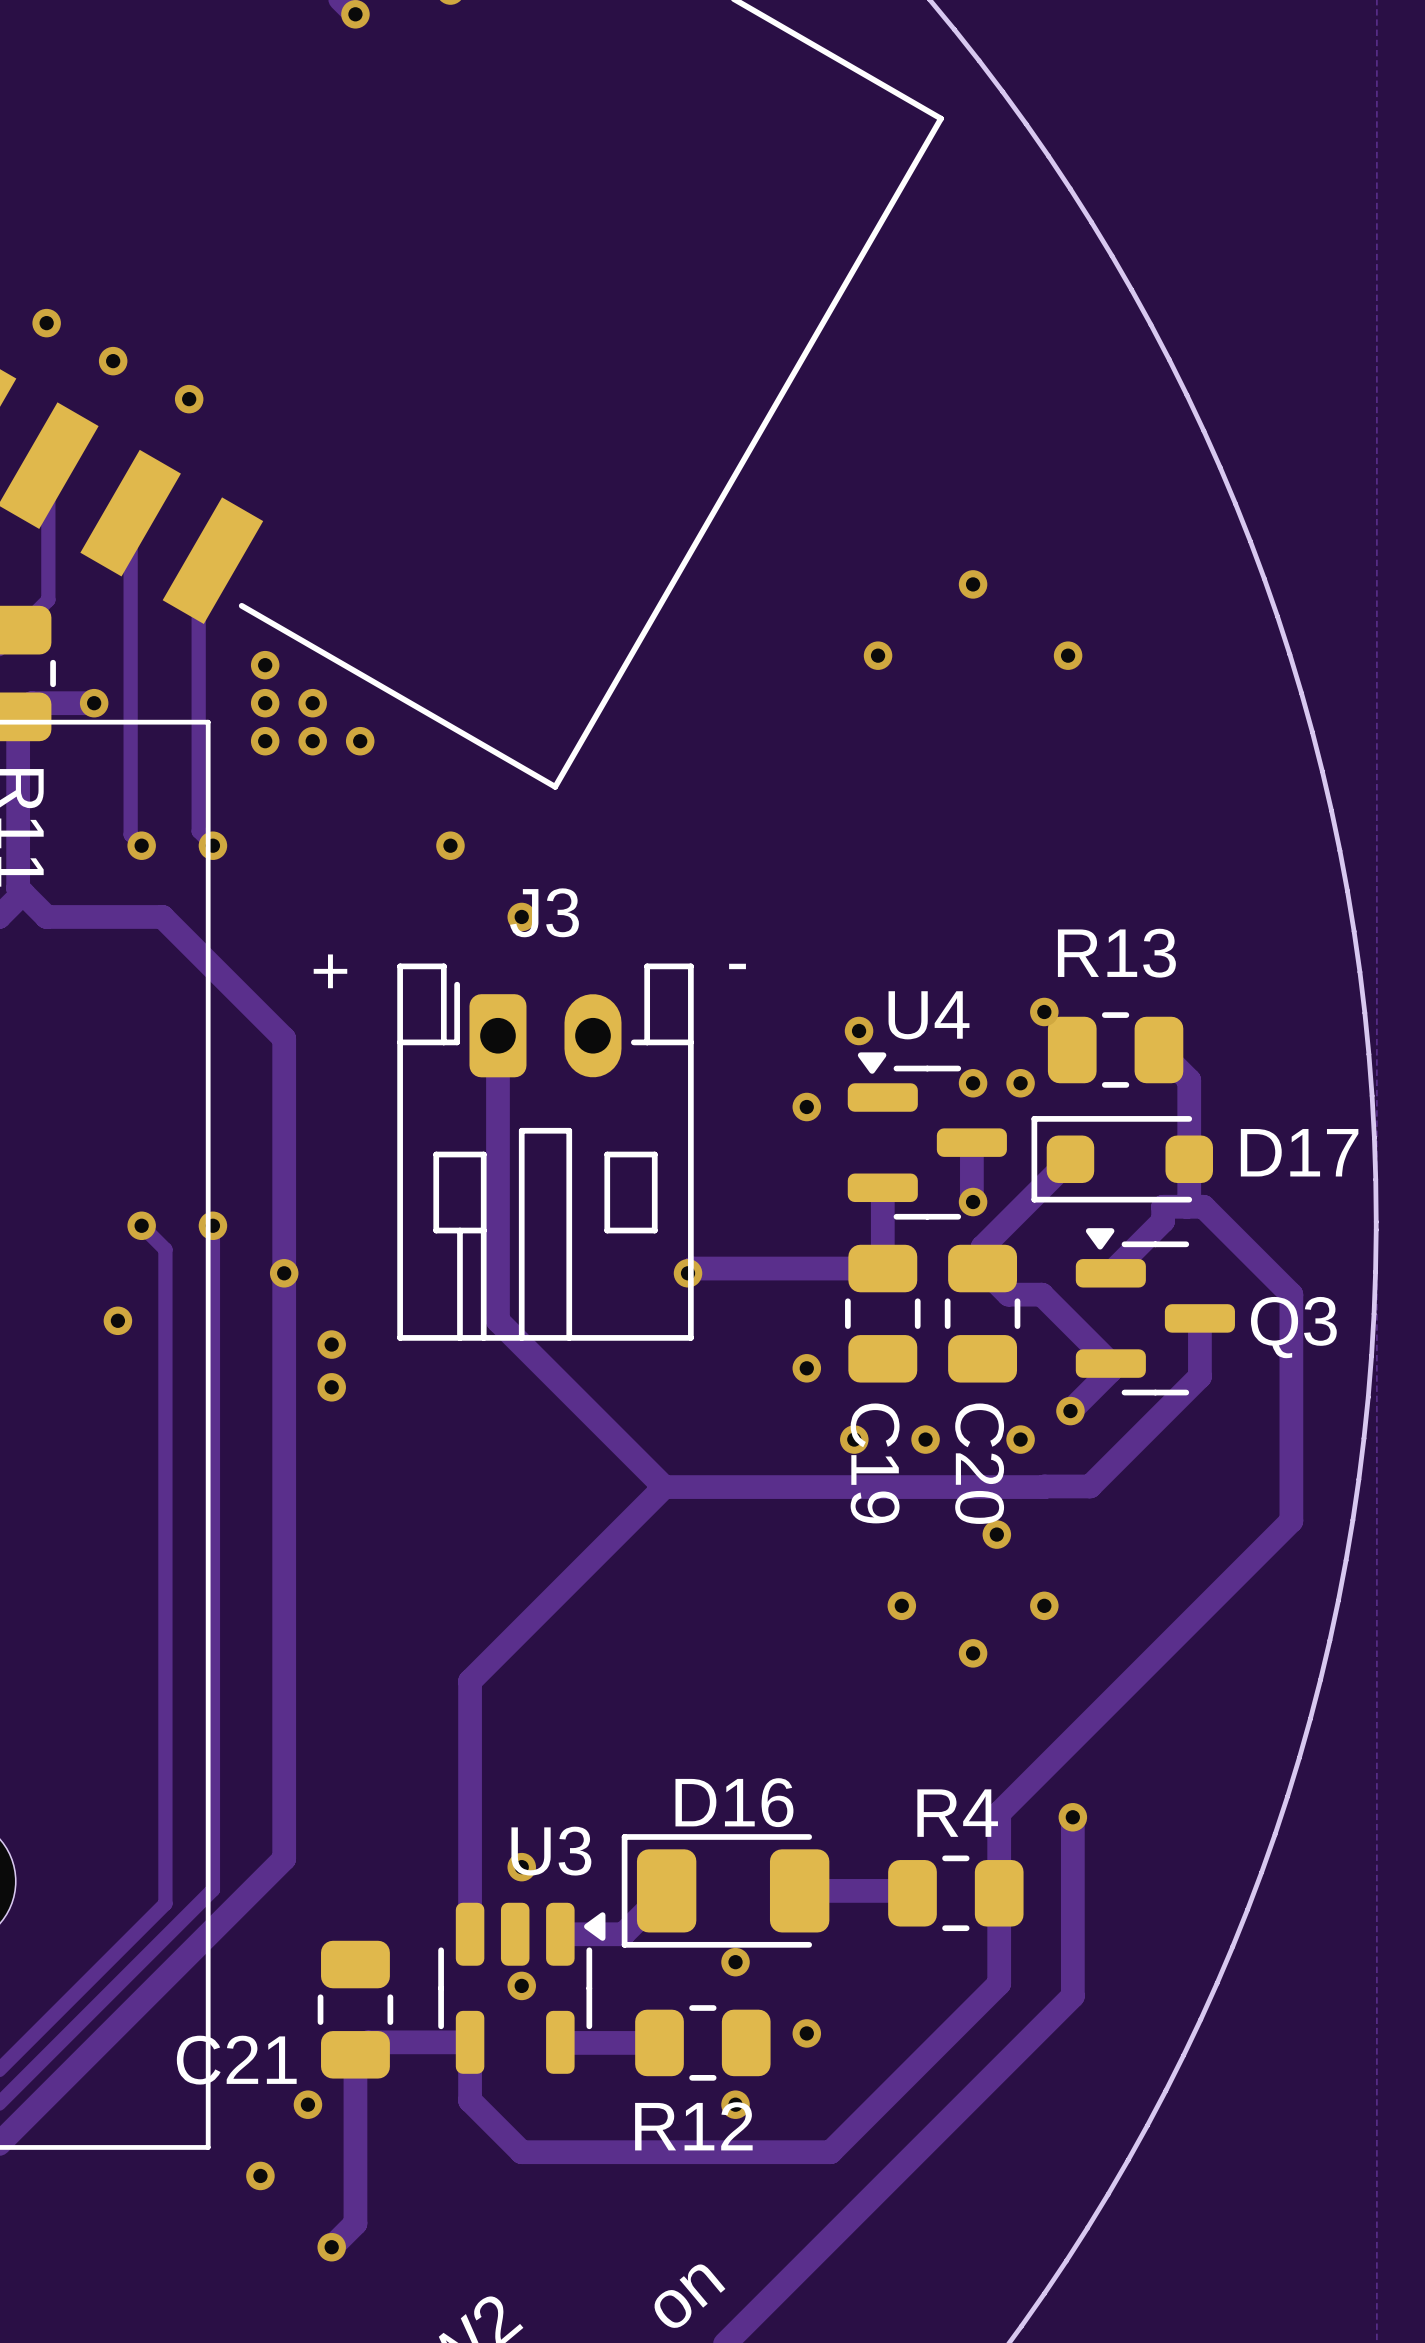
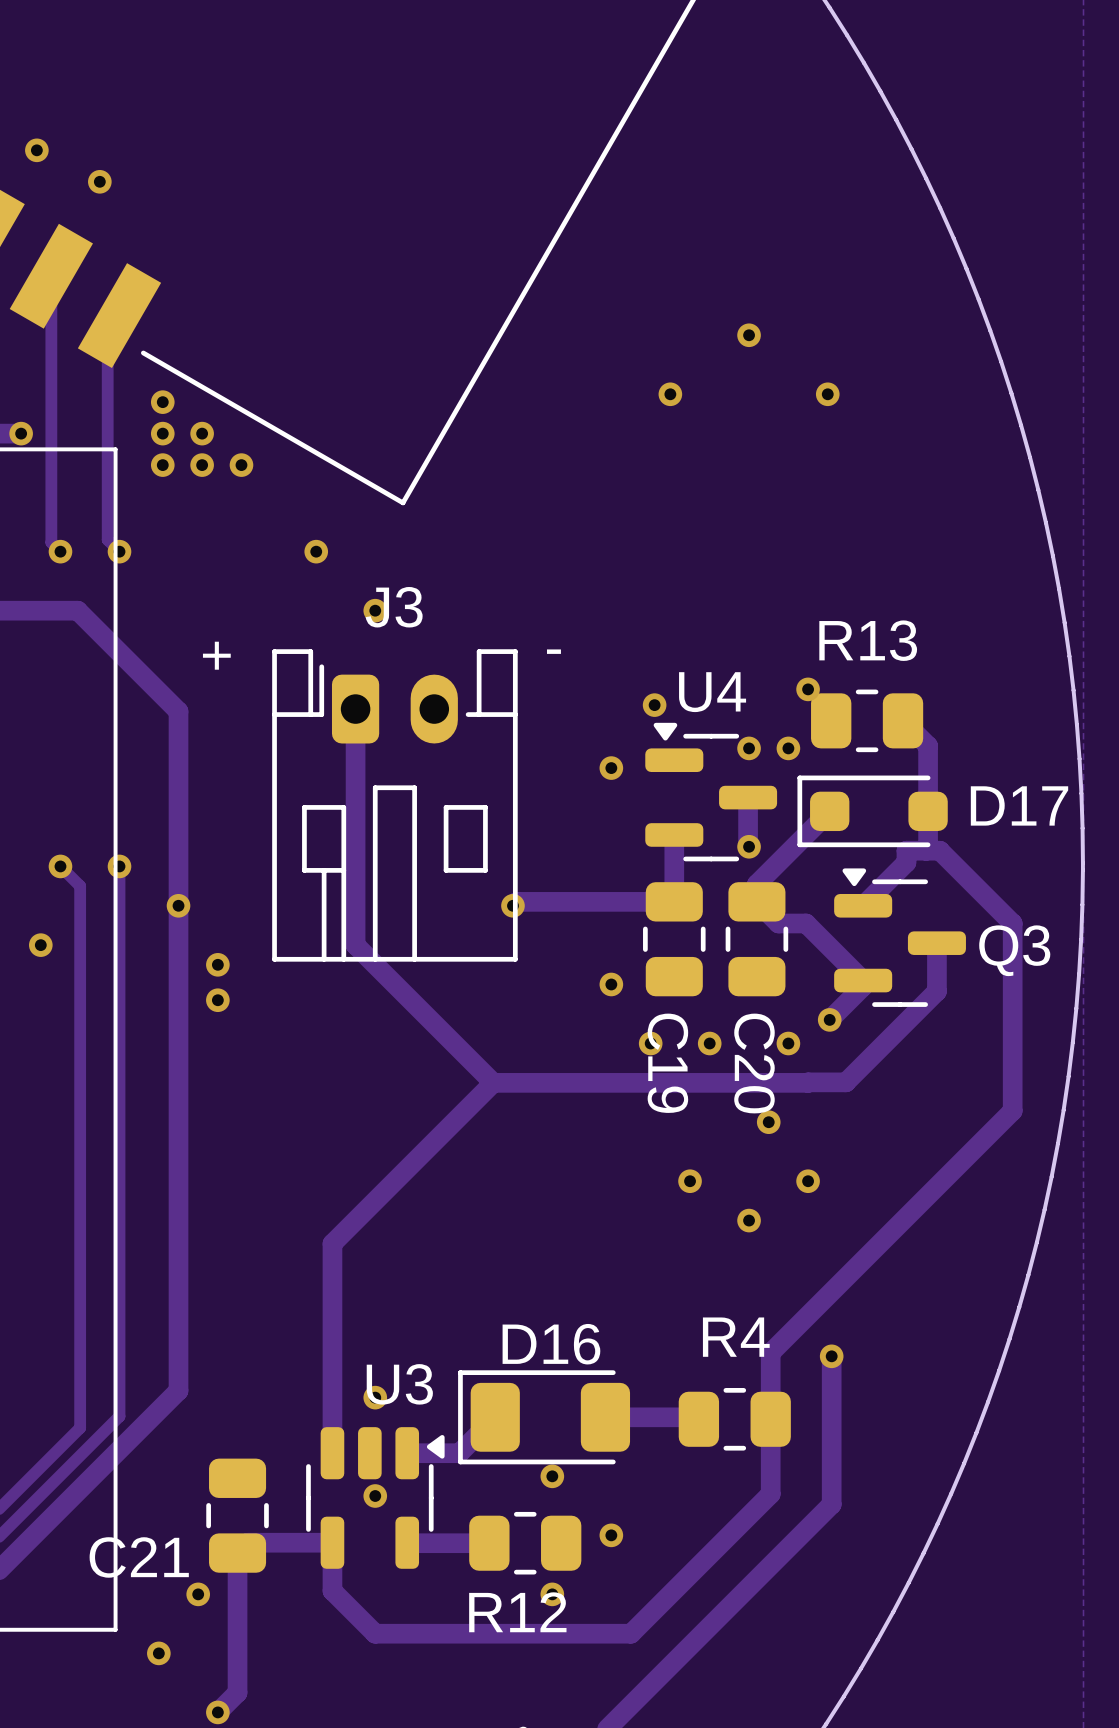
R4 name position: R4 (957, 1813) -> R4 (736, 1337)

